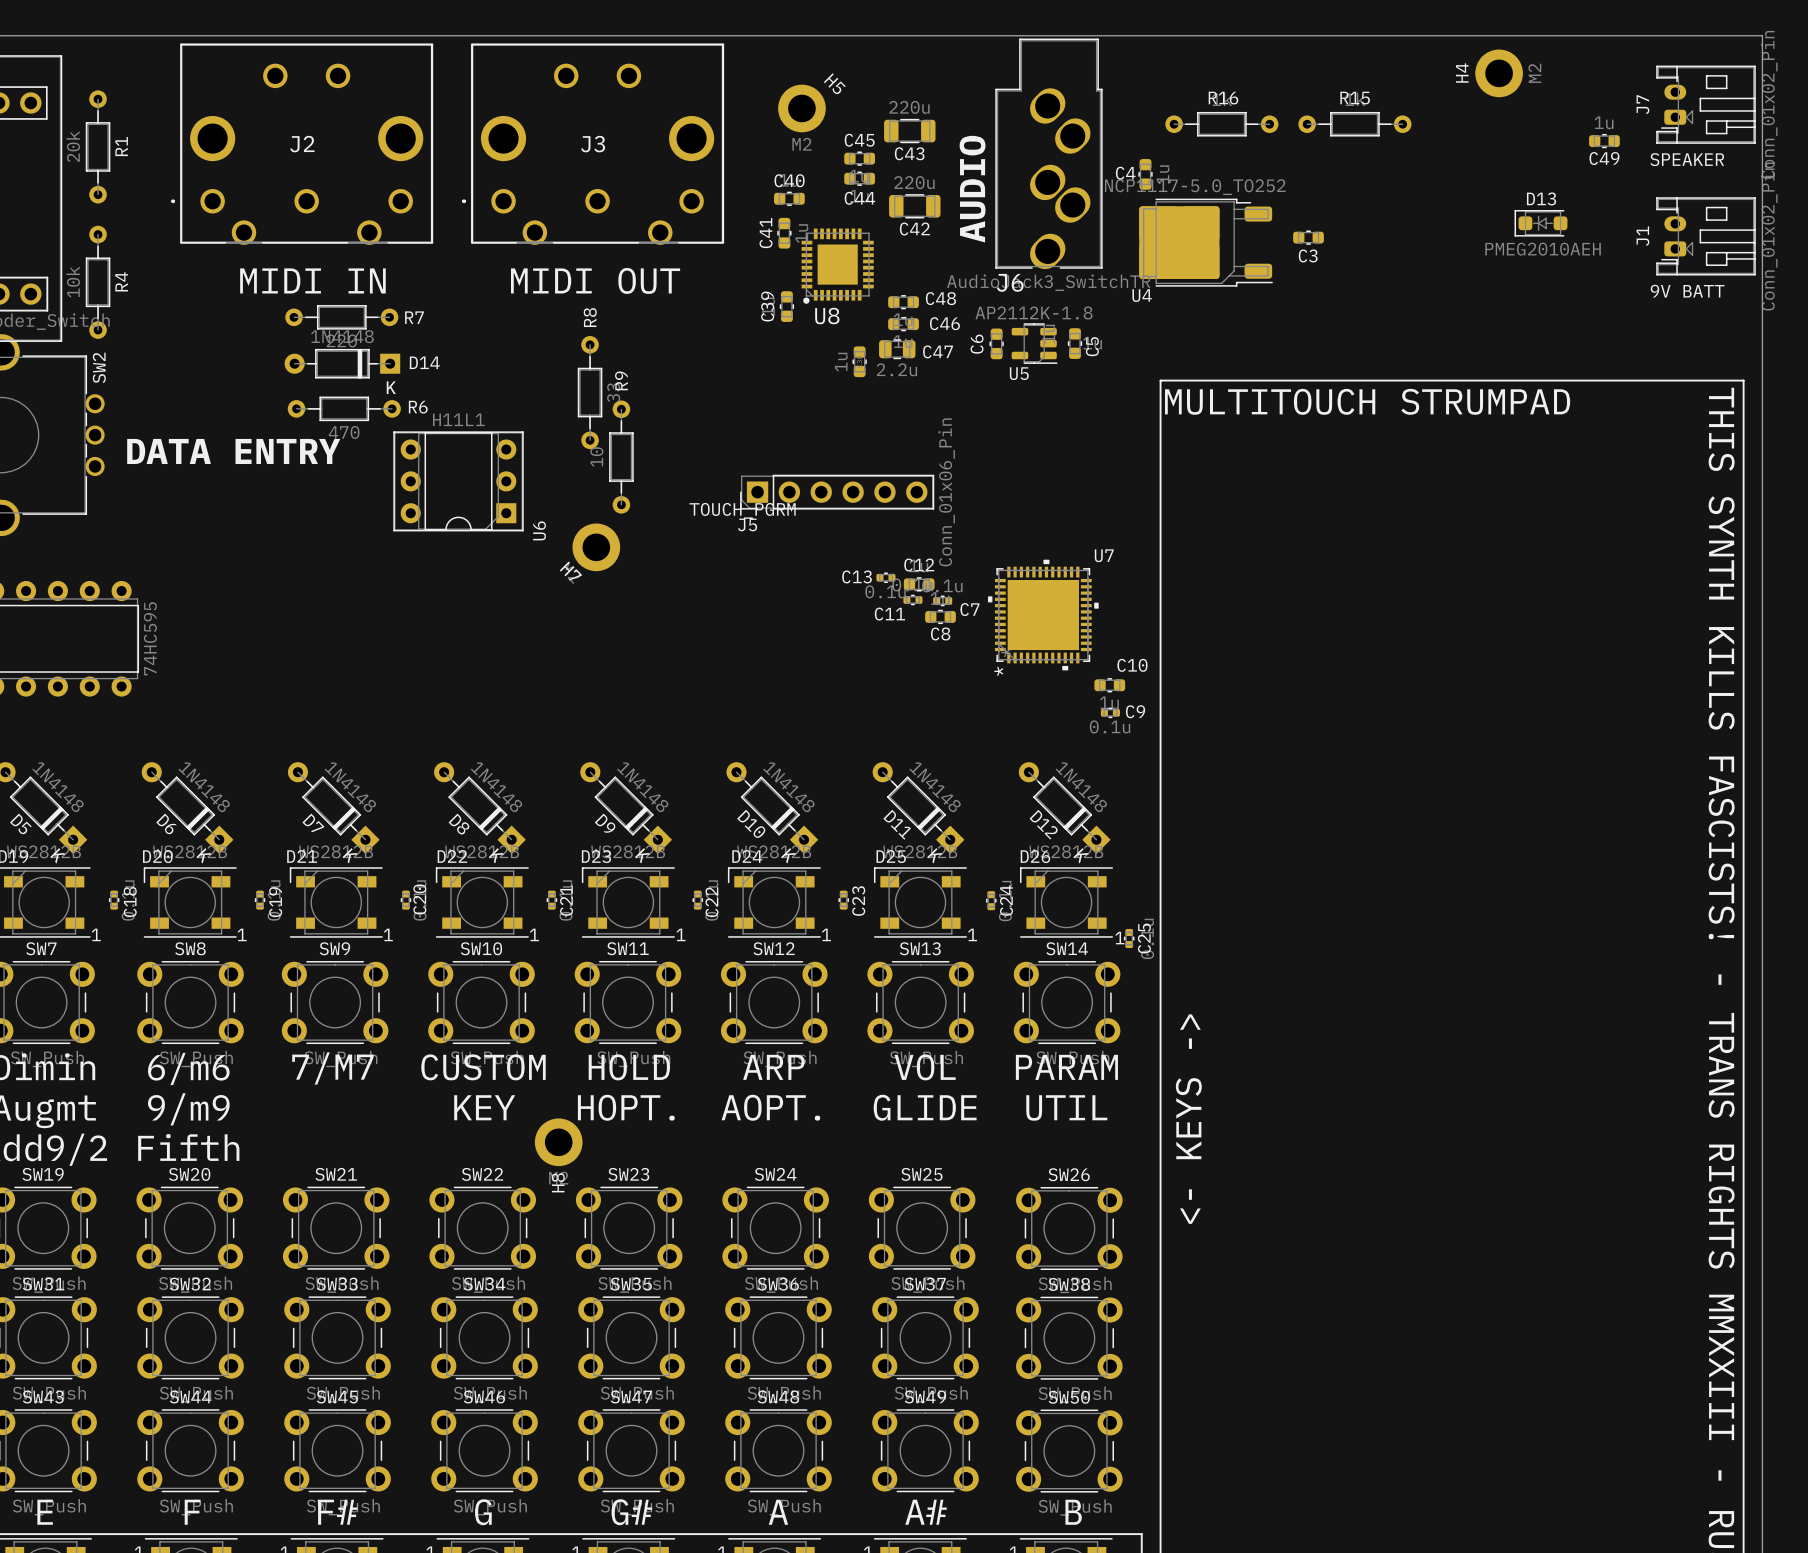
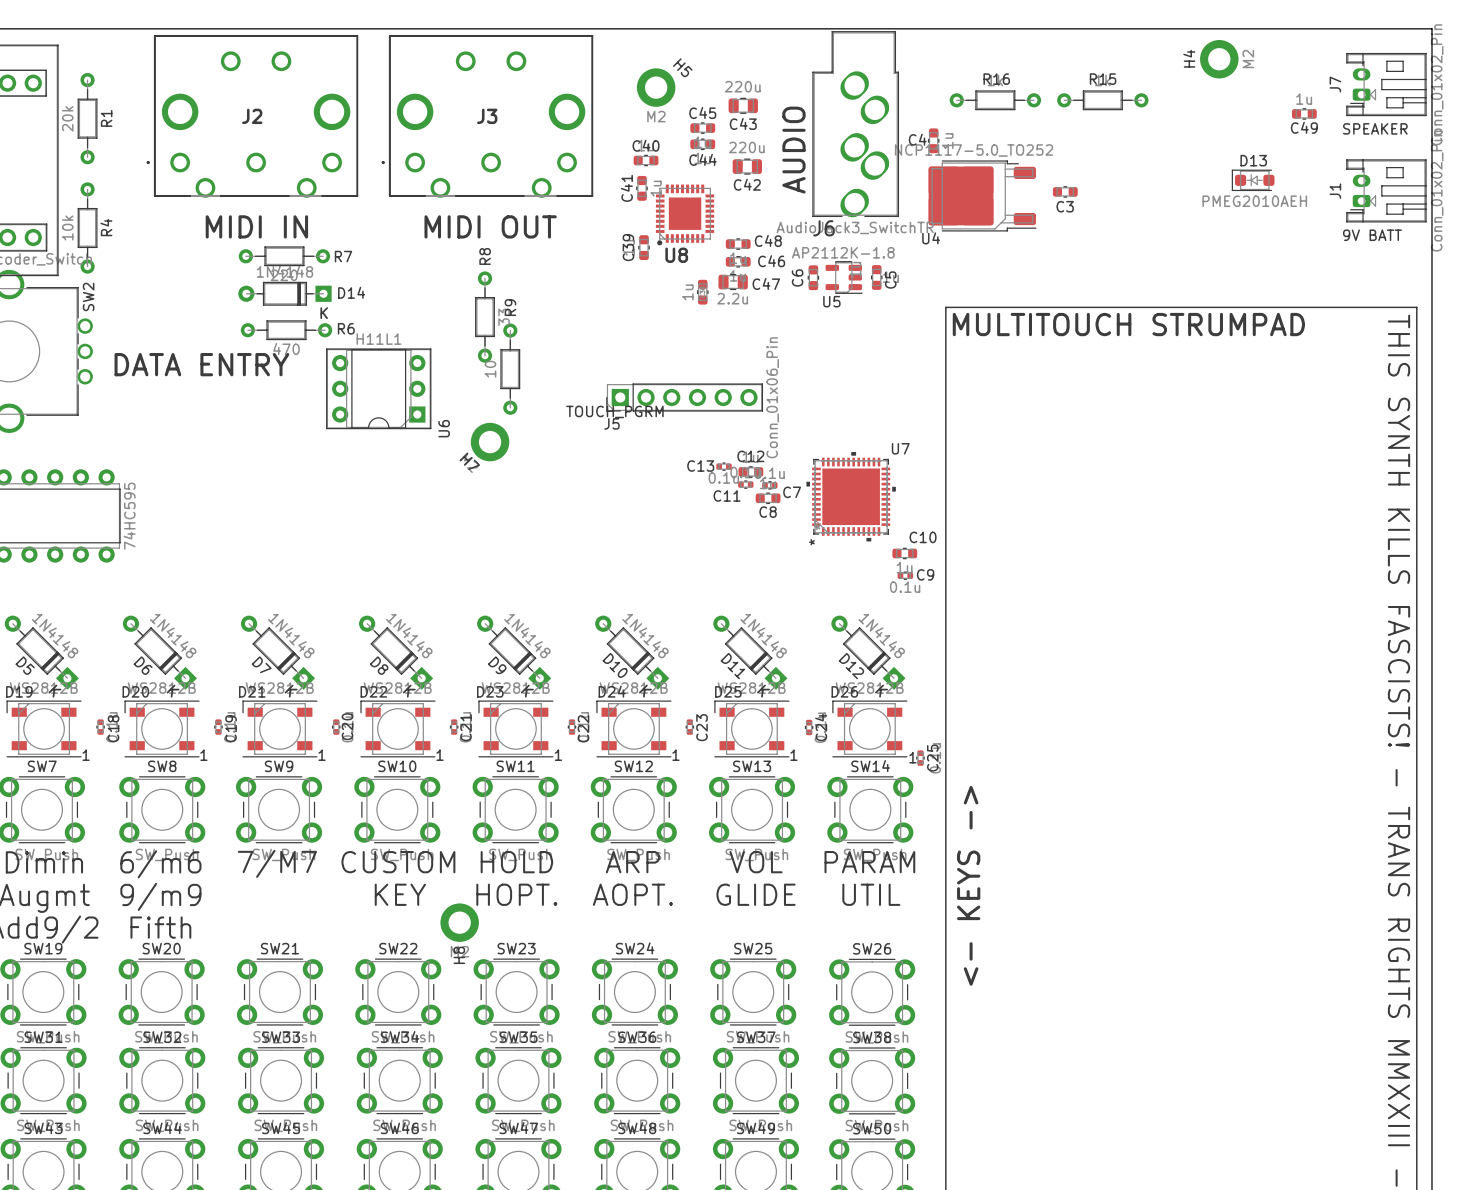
C43 footprint: [884, 118, 936, 144] -> [728, 97, 758, 114]
C42 footprint: [889, 194, 941, 219] -> [732, 158, 763, 175]

